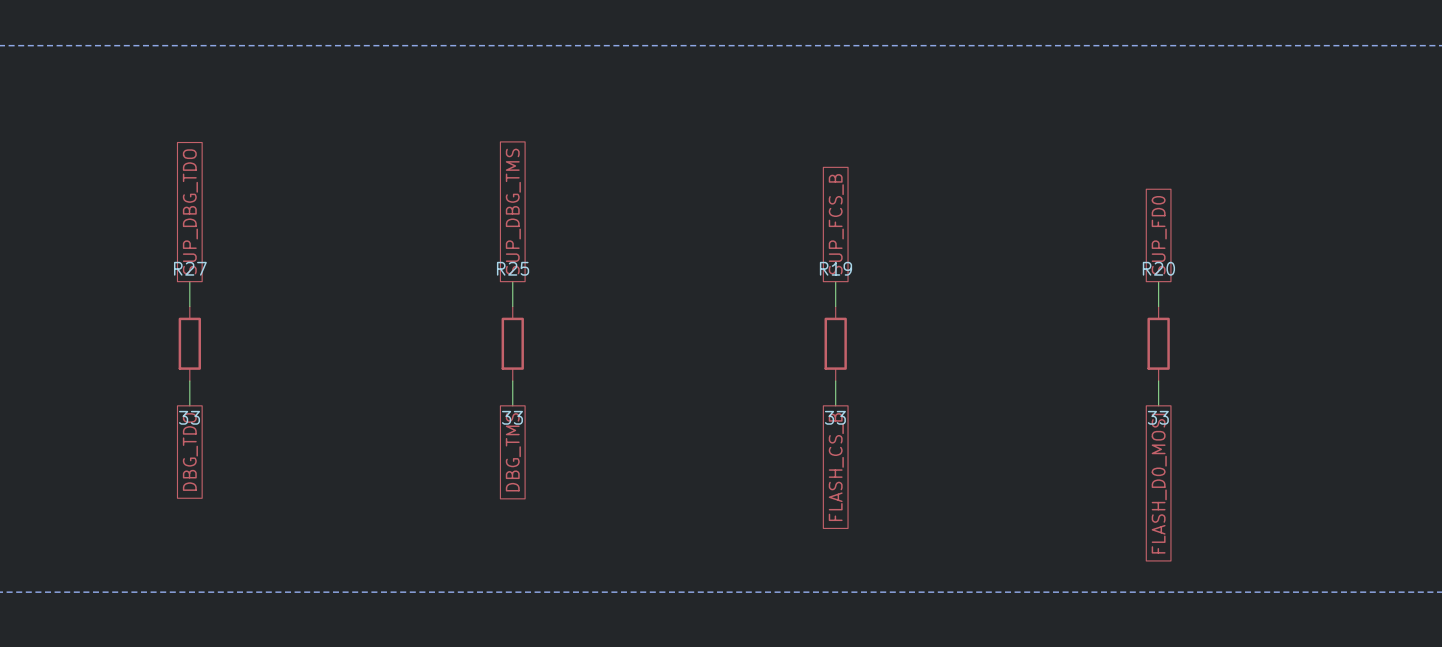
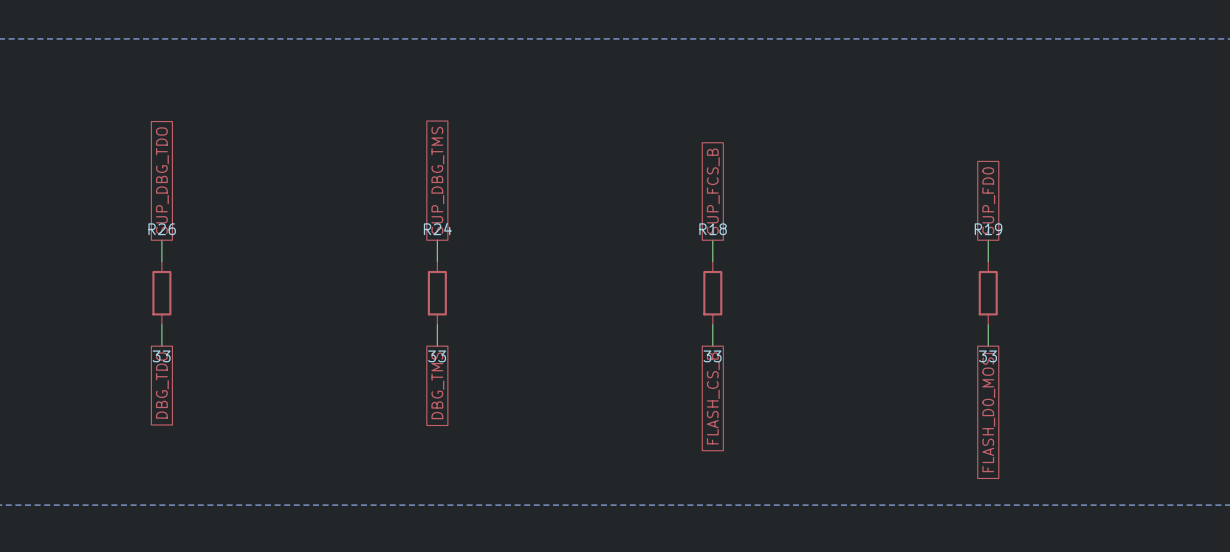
R27 name: R27 (190, 268) -> R26 (162, 229)
R25 name: R25 (513, 268) -> R24 (437, 228)
R19 name: R19 (835, 268) -> R18 (713, 229)
R20 name: R20 (1158, 268) -> R19 (988, 229)

